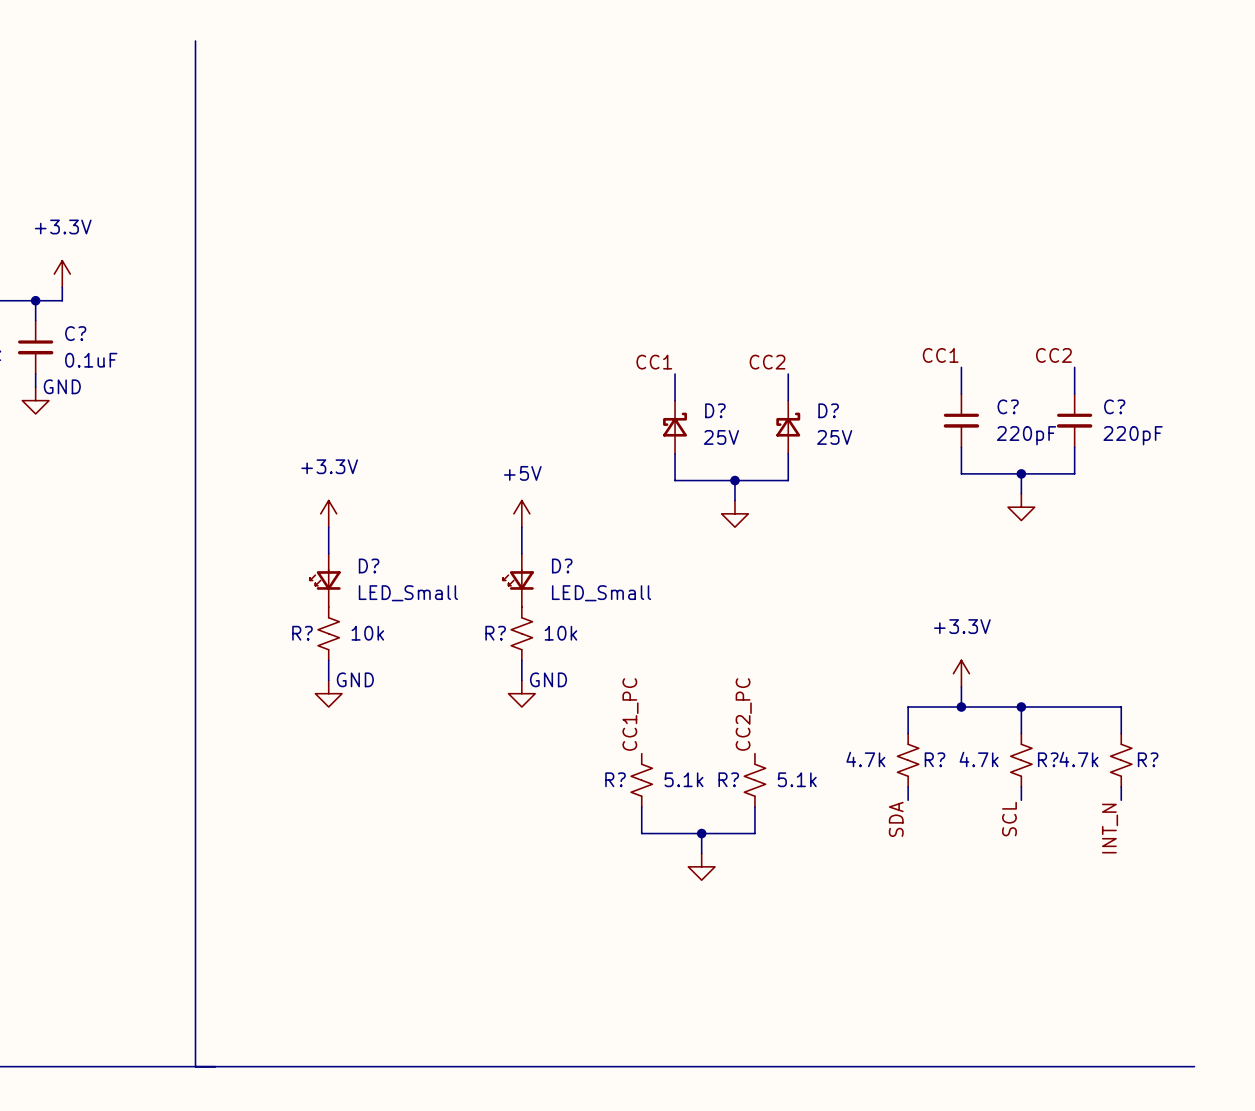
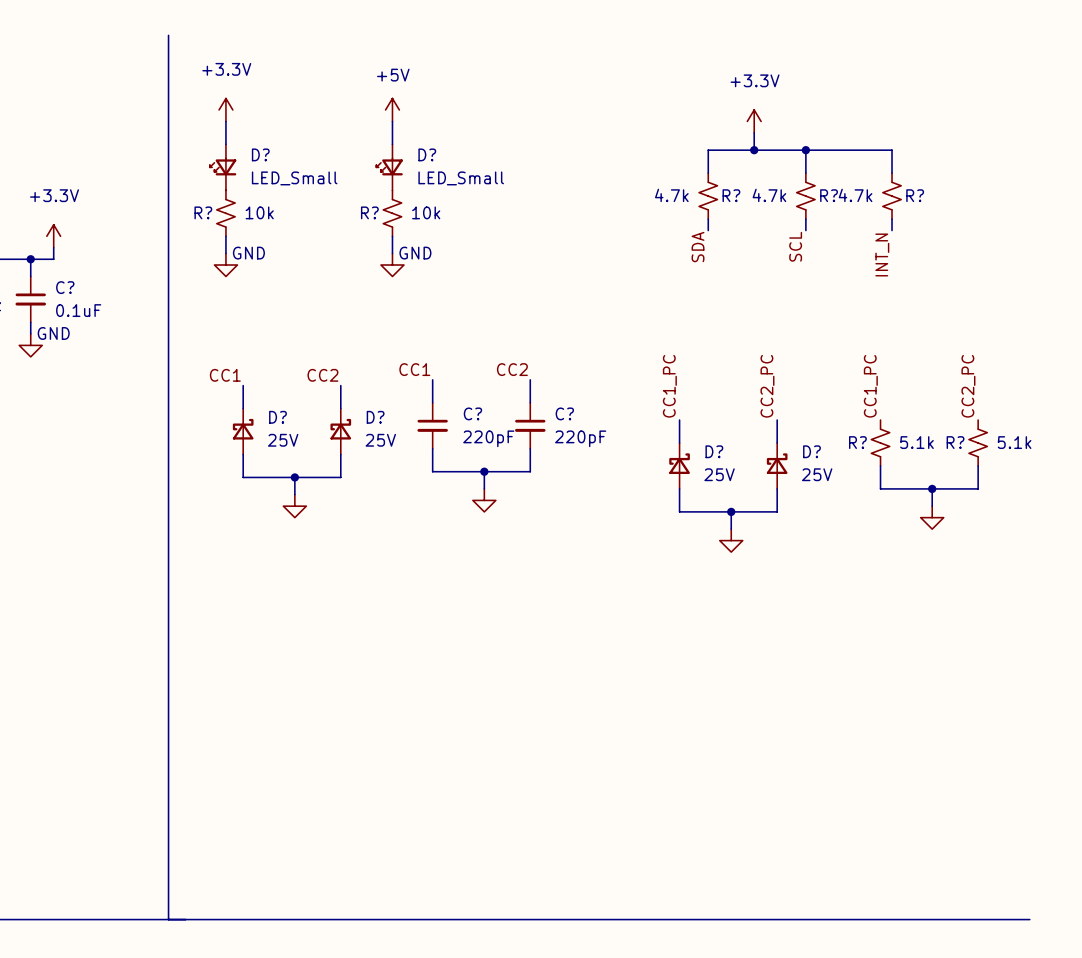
power symbol: none -> +3.3V (225, 109)
power symbol: none -> +5V (392, 109)
wire: none -> (225, 121) (225, 144)
wire: none -> (392, 121) (392, 144)
power symbol: none -> +3.3V (754, 121)
wire: none -> (754, 132) (754, 150)
junction: none -> (754, 150)
junction: none -> (805, 150)
D?: none -> LED_Small (223, 167)
D?: none -> LED_Small (389, 167)
wire: none -> (708, 173) (708, 150) (892, 150) (892, 173)
R?: none -> 4.7k (708, 196)
R?: none -> 4.7k (805, 196)
R?: none -> 4.7k (892, 196)
R?: none -> 10k (225, 213)
R?: none -> 10k (392, 213)
wire: none -> (708, 219) (708, 230)
wire: none -> (805, 219) (805, 230)
wire: none -> (892, 219) (892, 230)
wire: none -> (225, 236) (225, 253)
wire: none -> (392, 236) (392, 253)
label: none -> SDA (698, 247)
label: none -> SCL (795, 246)
label: none -> INT_N (882, 254)
power symbol: none -> GND (225, 265)
power symbol: none -> GND (392, 265)
label: CC1 (940, 355) -> none
label: CC2 (1053, 355) -> none
label position: CC1 (654, 362) -> CC1 (414, 369)
label position: CC2 (767, 362) -> CC2 (512, 369)
wire: (961, 367) (961, 393) -> (805, 150) (805, 173)
wire: (1074, 367) (1074, 393) -> none
wire: (675, 373) (675, 400) -> (679, 420) (679, 443)
wire: (788, 373) (788, 400) -> (777, 420) (777, 443)
C?: 220pF (961, 420) -> none
C?: 220pF (1074, 420) -> none
D?: 25V (675, 427) -> none
D?: 25V (788, 427) -> none
label: none -> CC1 (225, 375)
label: none -> CC2 (322, 375)
wire: none -> (530, 379) (530, 402)
wire: none -> (340, 385) (340, 408)
wire: (961, 447) (961, 473) (1074, 473) (1074, 447) -> (880, 465) (880, 488) (978, 488) (978, 465)
label: none -> CC1_PC (669, 386)
label: none -> CC2_PC (767, 386)
label: none -> CC1_PC (870, 386)
label: none -> CC2_PC (968, 386)
wire: (675, 453) (675, 480) (788, 480) (788, 453) -> (679, 488) (679, 511) (777, 511) (777, 488)
wire: (1021, 473) (1021, 493) -> (932, 488) (932, 506)
junction: (1021, 473) -> none
wire: (734, 480) (734, 500) -> (731, 511) (731, 529)
junction: (734, 480) -> none
C?: none -> 220pF (432, 425)
C?: none -> 220pF (530, 425)
D?: none -> 25V (243, 431)
D?: none -> 25V (340, 431)
power symbol: (1021, 507) -> none
power symbol: +3.3V (328, 513) -> none
power symbol: +5V (521, 513) -> none
power symbol: (734, 513) -> none
R?: none -> 5.1k (880, 443)
R?: none -> 5.1k (978, 443)
wire: none -> (432, 448) (432, 471) (530, 471) (530, 448)
wire: none -> (243, 454) (243, 477) (340, 477) (340, 454)
wire: (328, 527) (328, 553) -> (243, 385) (243, 408)
wire: (521, 527) (521, 553) -> (432, 379) (432, 402)
D?: none -> 25V (679, 465)
D?: none -> 25V (777, 465)
junction: none -> (484, 471)
junction: none -> (294, 477)
junction: none -> (932, 488)
D?: LED_Small (325, 580) -> none
D?: LED_Small (518, 580) -> none
power symbol: none -> (484, 500)
power symbol: none -> (294, 506)
junction: none -> (731, 511)
power symbol: none -> (932, 517)
power symbol: none -> (731, 540)
R?: 10k (328, 633) -> none
R?: 10k (521, 633) -> none
wire: (328, 660) (328, 680) -> (294, 477) (294, 494)
wire: (521, 660) (521, 680) -> (484, 471) (484, 488)
power symbol: +3.3V (961, 673) -> none
wire: (961, 687) (961, 707) -> none
power symbol: GND (328, 693) -> none
power symbol: GND (521, 693) -> none
junction: (961, 707) -> none
wire: (1021, 707) (1021, 733) -> none
junction: (1021, 707) -> none
label: CC1_PC (630, 714) -> none
label: CC2_PC (743, 714) -> none
wire: (908, 733) (908, 707) (1121, 707) (1121, 733) -> none
R?: 4.7k (908, 760) -> none
R?: 4.7k (1021, 760) -> none
R?: 4.7k (1121, 760) -> none
R?: 5.1k (641, 780) -> none
R?: 5.1k (754, 780) -> none
wire: (908, 786) (908, 800) -> none
wire: (1021, 786) (1021, 800) -> none
wire: (1121, 786) (1121, 800) -> none
wire: (641, 806) (641, 833) (754, 833) (754, 806) -> none
label: SDA (896, 819) -> none
label: SCL (1009, 819) -> none
label: INT_N (1110, 828) -> none
wire: (701, 833) (701, 853) -> none
junction: (701, 833) -> none
power symbol: (701, 866) -> none

